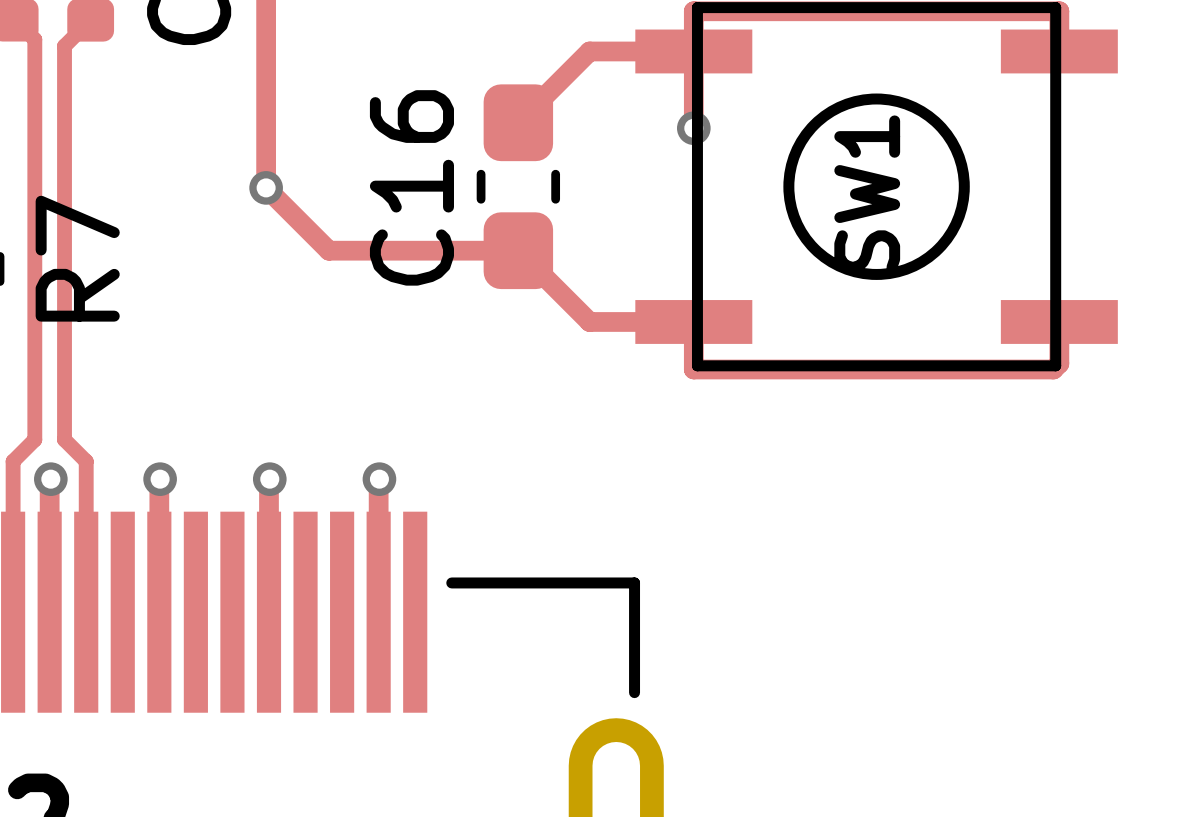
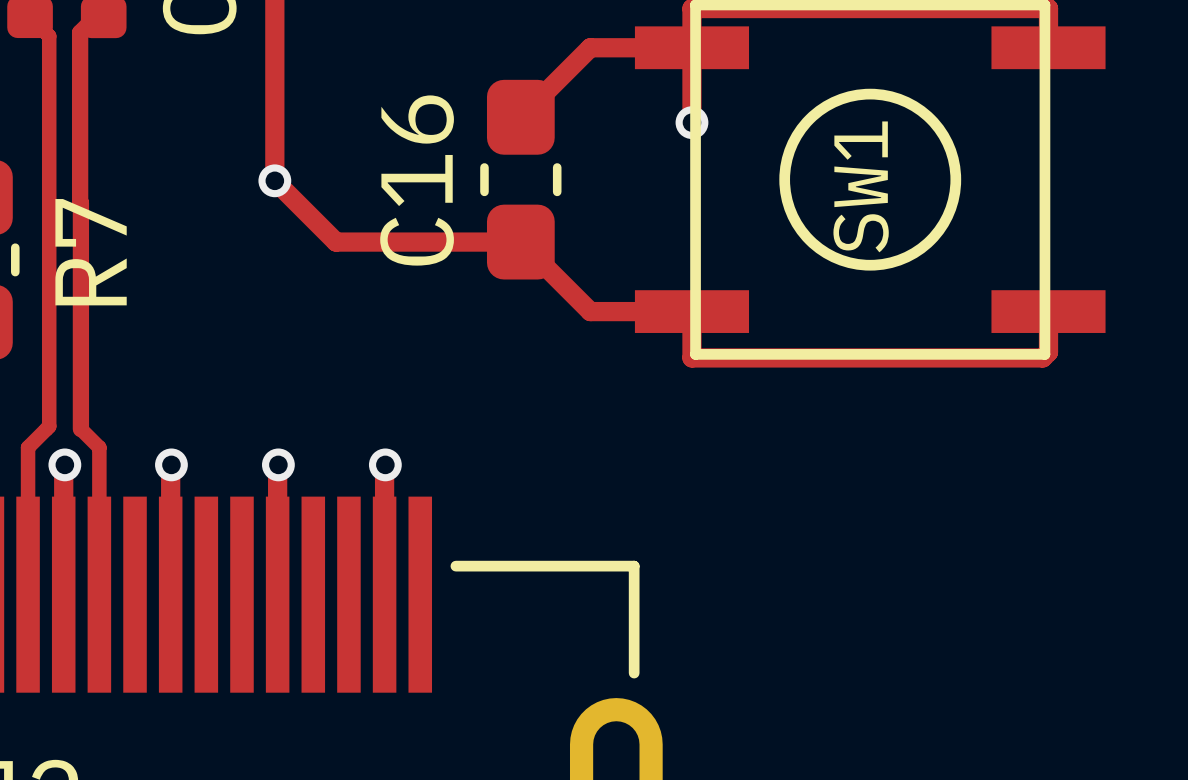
top track: none -> (95, 16) (80, 32) (80, 202)
top track: (90, 20) (64, 46) (64, 439) (67, 442) -> (80, 203) (80, 429)

